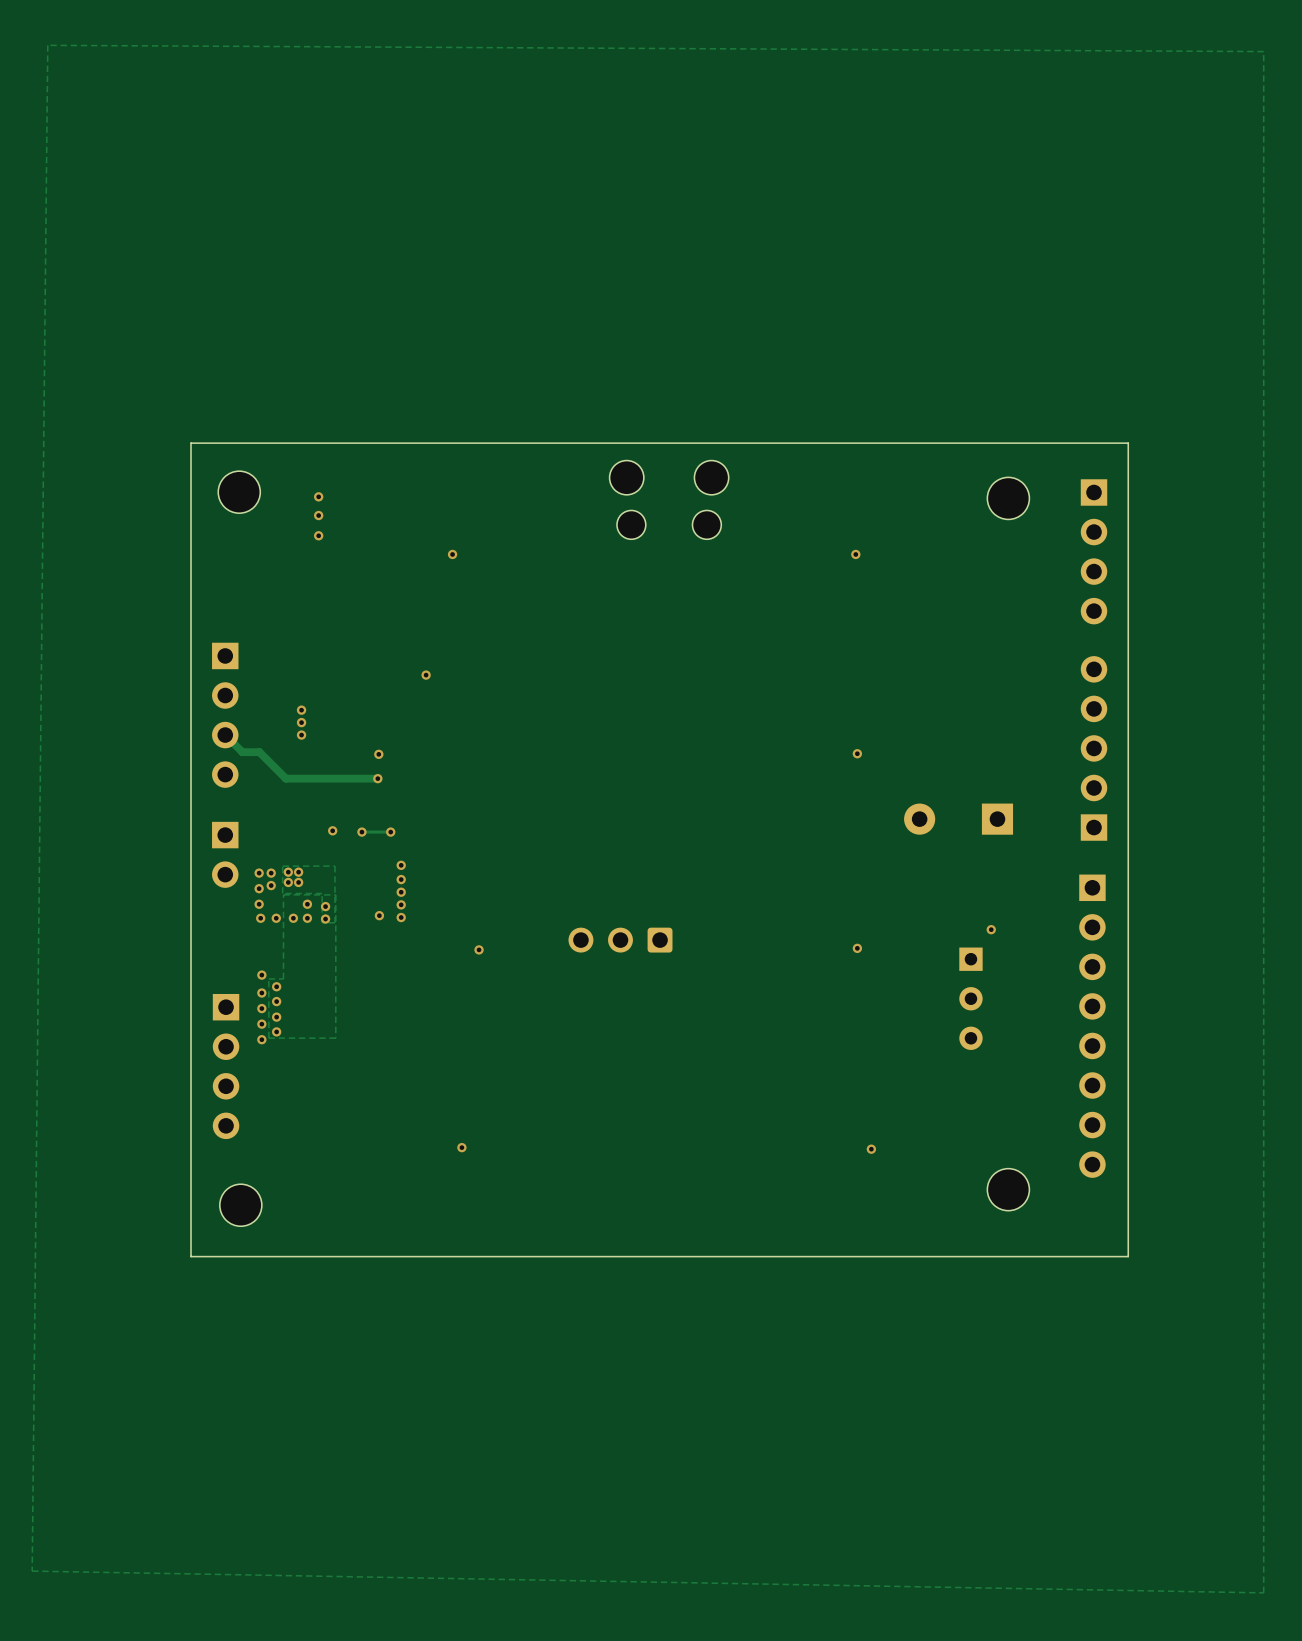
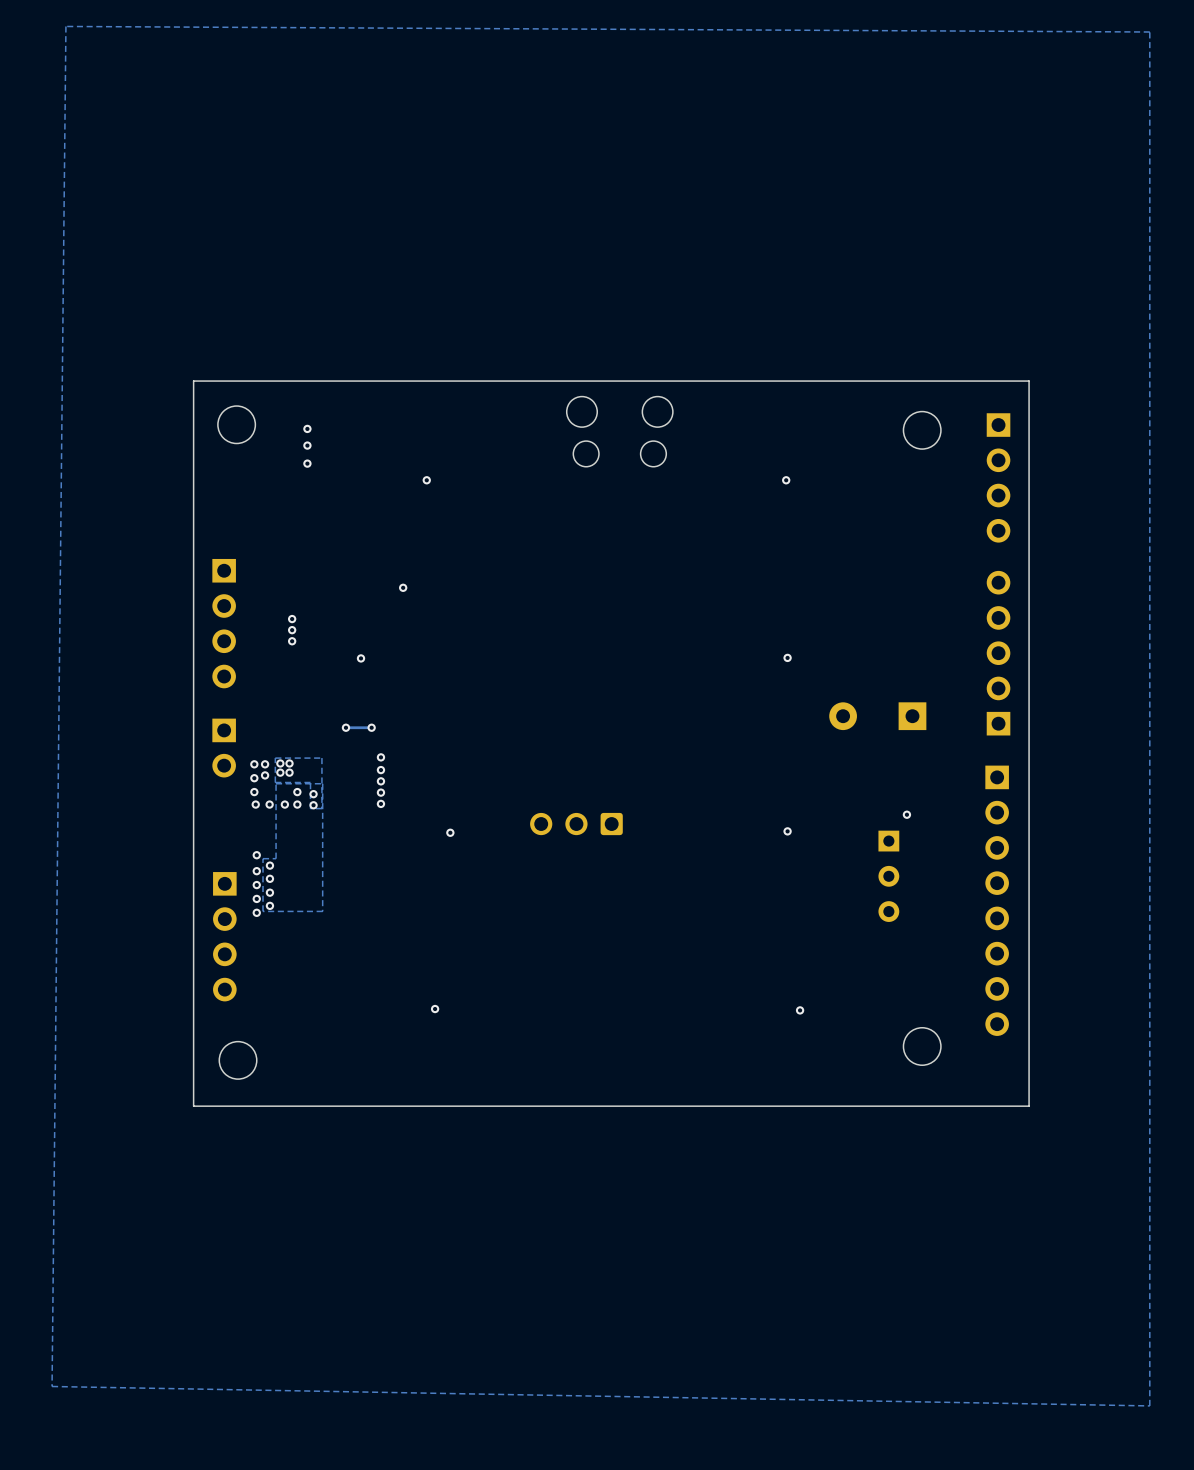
track: (225, 735) (242, 752) (259, 752) (285, 778) (377, 778) -> none
via: (377, 778) -> none
via: (332, 830) -> none
via: (379, 915) -> none

